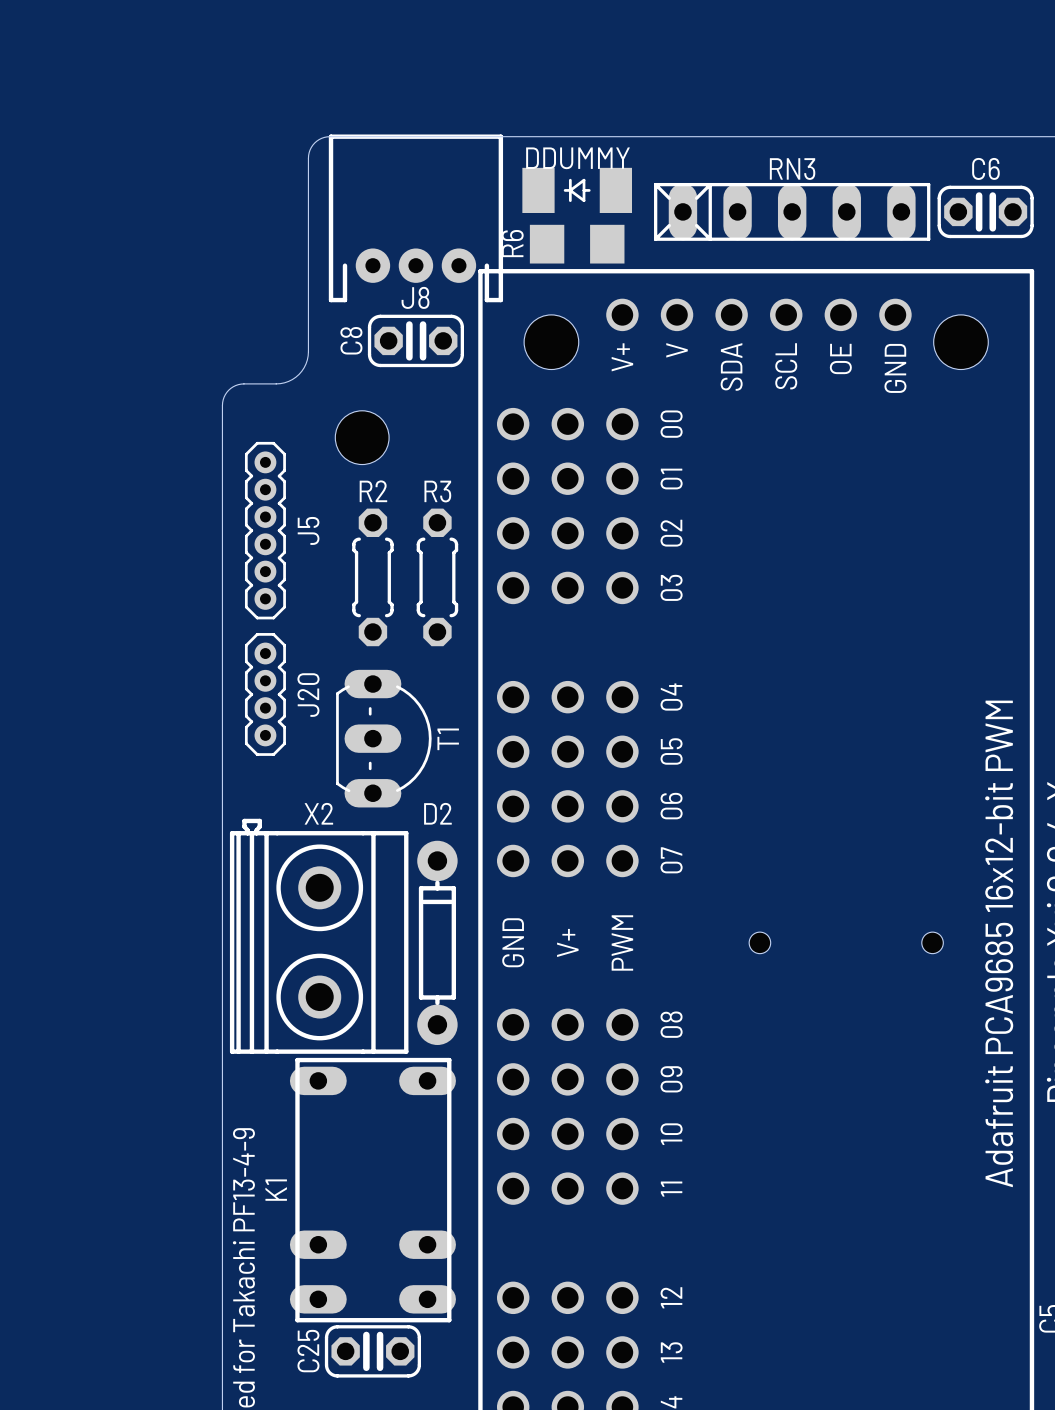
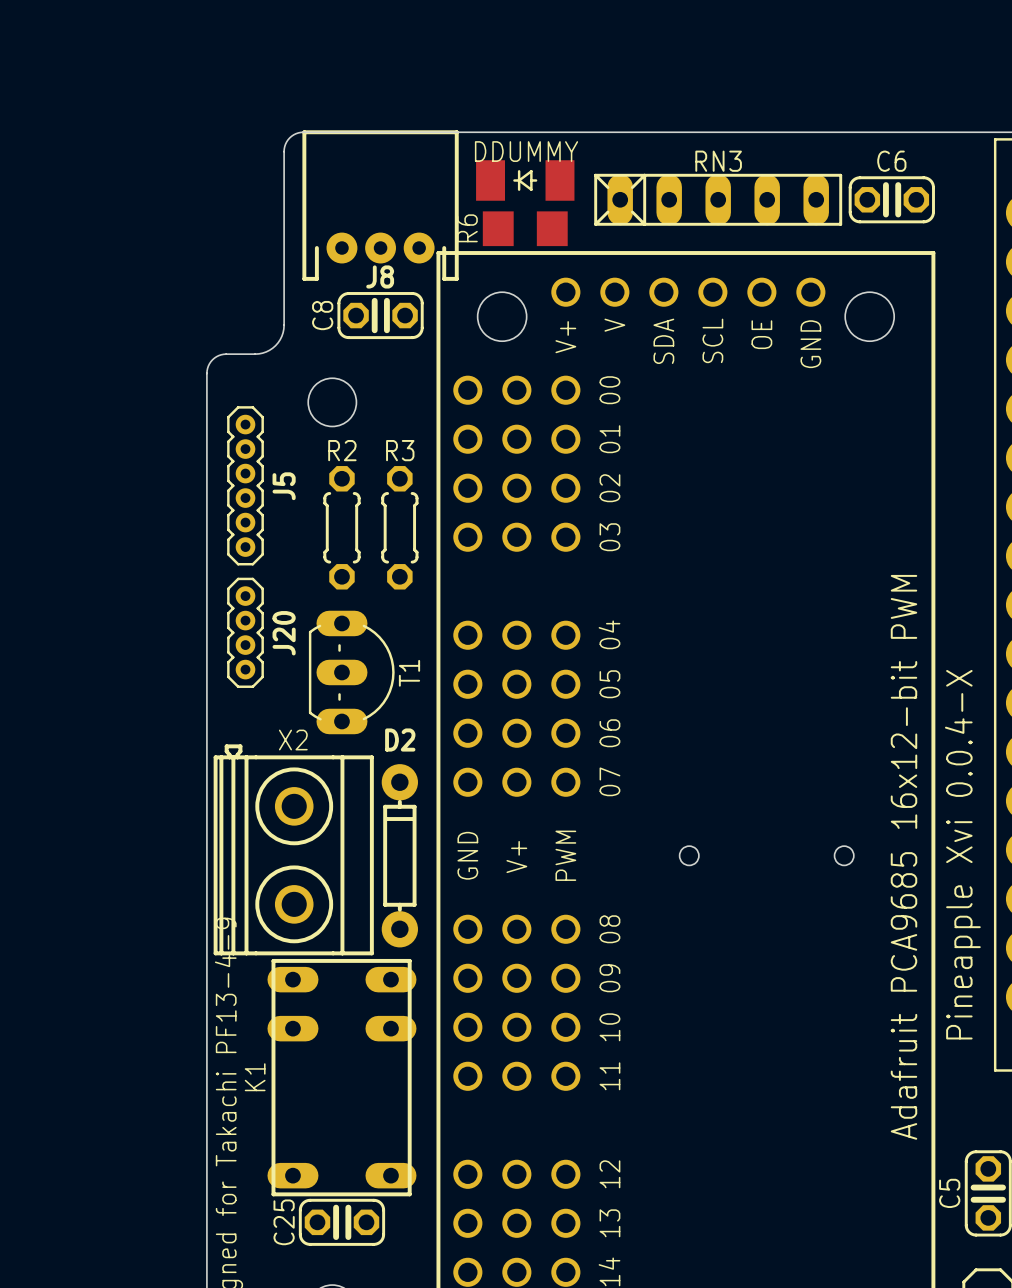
K1 rotation: 0° (372, 1190) -> 180° (341, 1077)

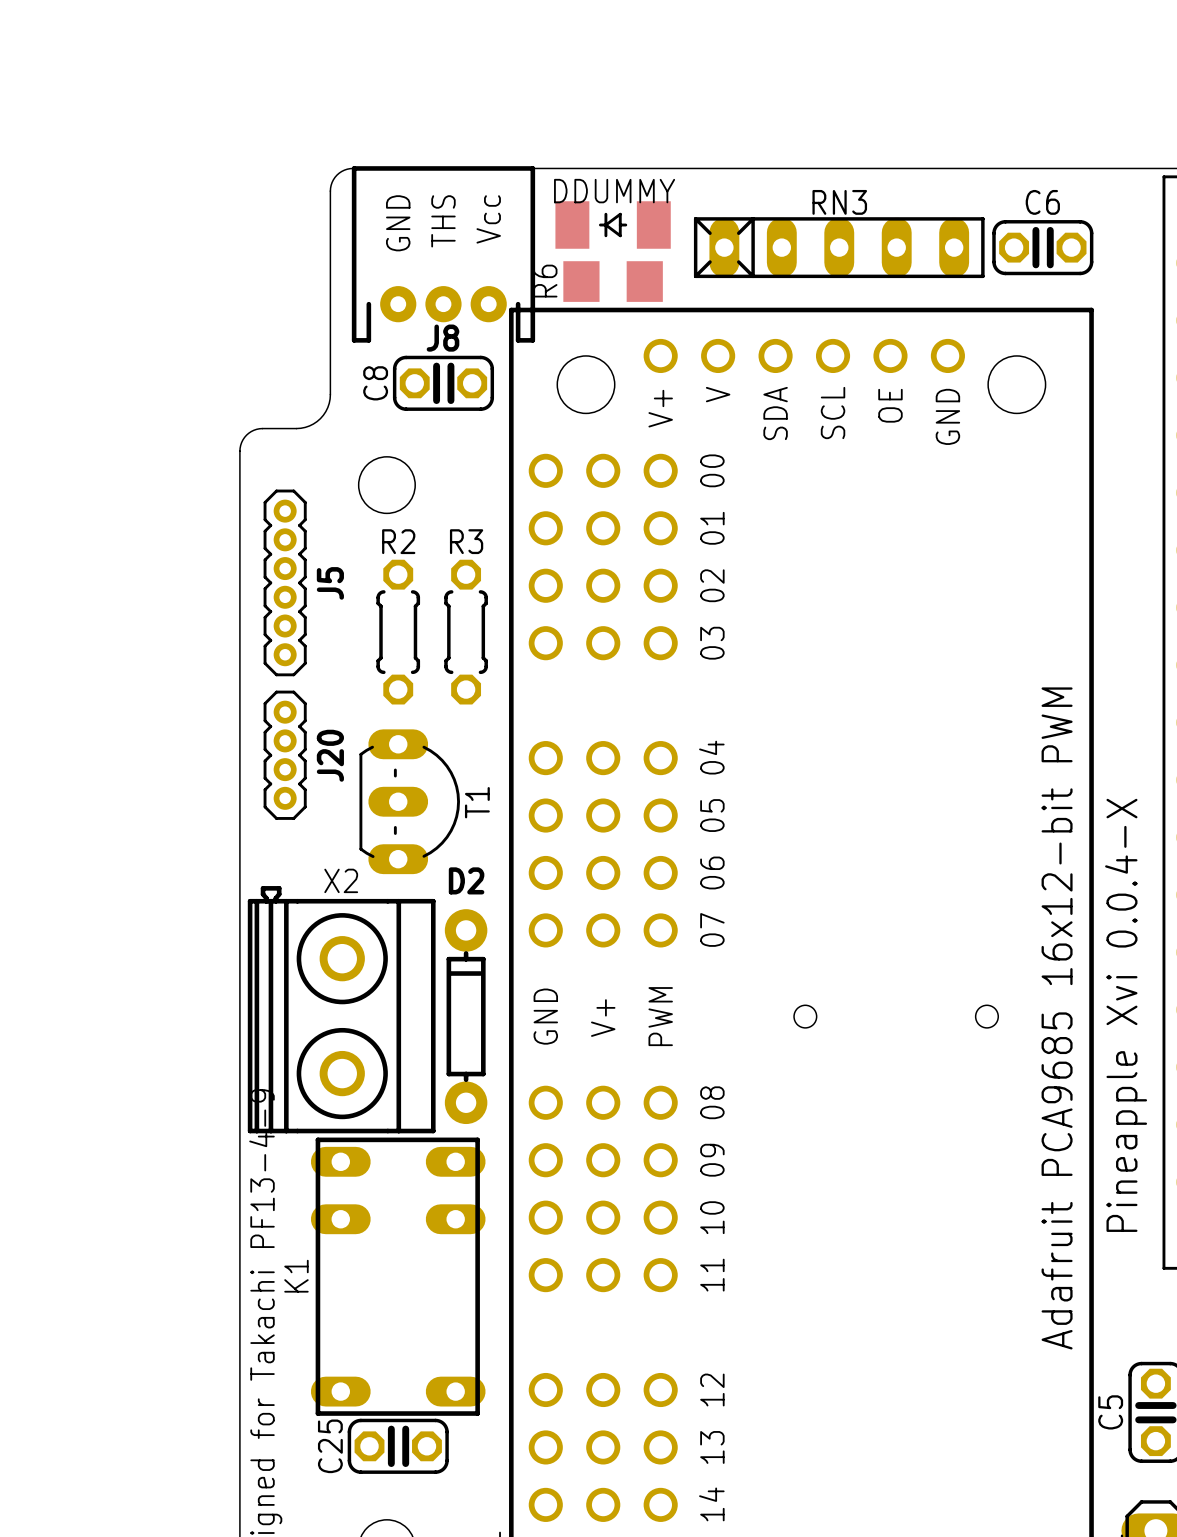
text: none -> Vcc (488, 219)
text: none -> THS (443, 221)
text: none -> GND (398, 223)

